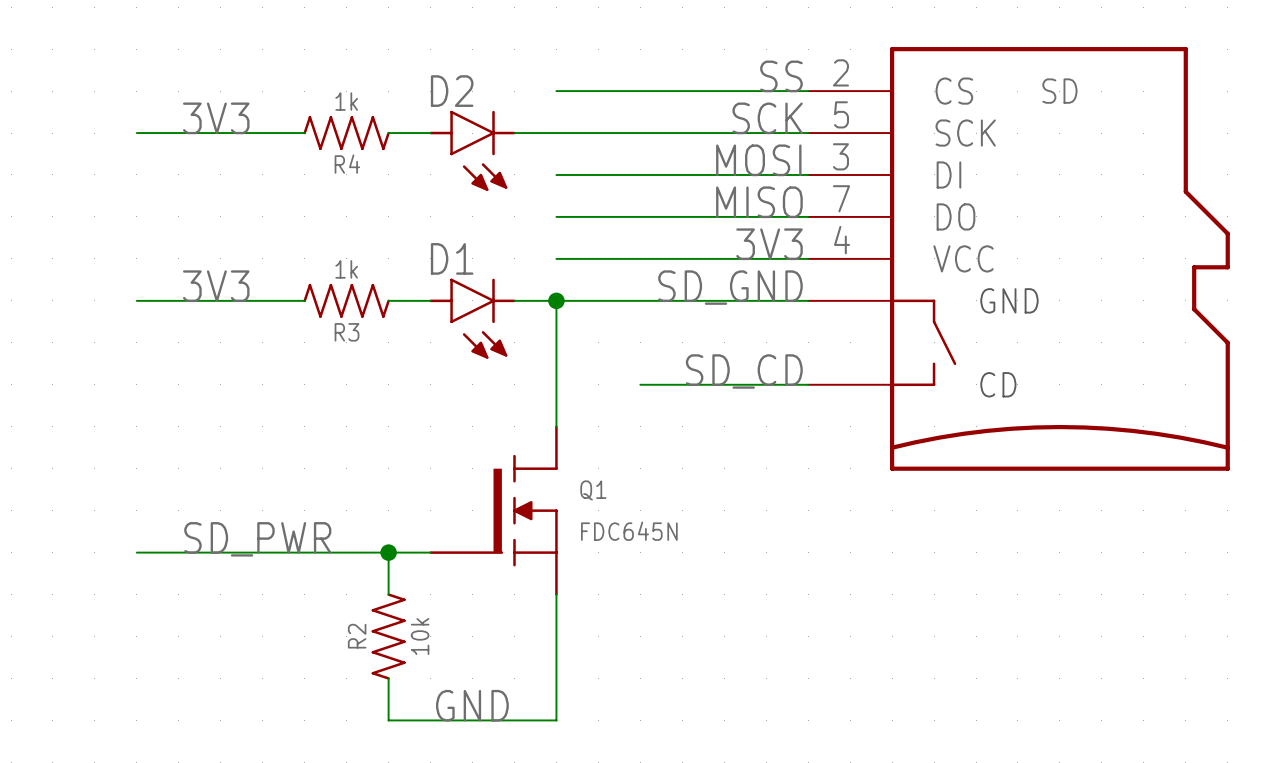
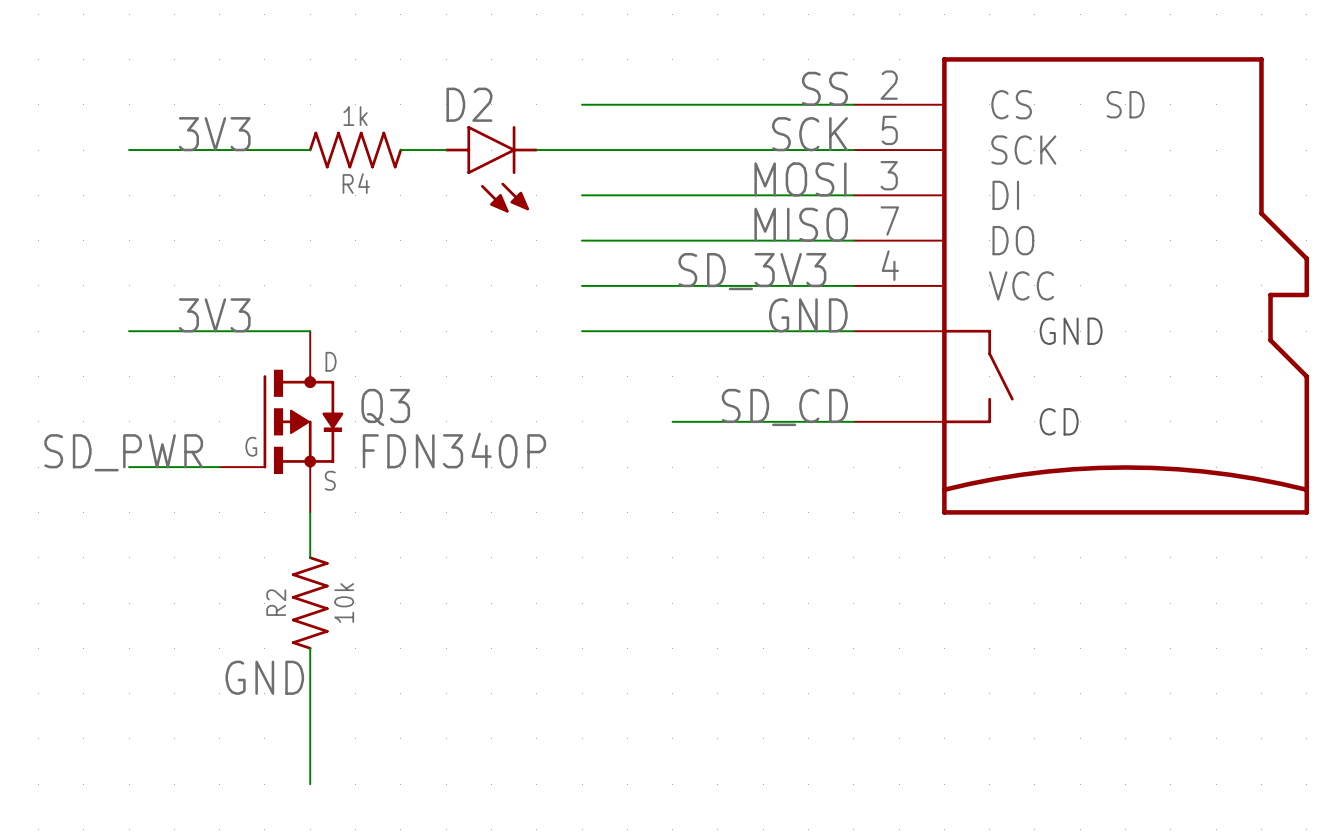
label: 3V3 (769, 244) -> SD_3V3 (752, 271)
label: SD_GND (730, 287) -> GND (808, 315)
R3: 1k (346, 300) -> none
wire: (388, 300) (430, 300) -> none
wire: (514, 300) (556, 300) (556, 426) -> none
junction: (556, 300) -> none
D1: (472, 318) -> none
Q3: none -> FDN340P (281, 421)
wire: none -> (129, 467) (219, 467)
Q1: FDC645N (493, 510) -> none
label position: SD_PWR (257, 539) -> SD_PWR (123, 452)
wire: (136, 552) (430, 552) -> none
wire: (388, 552) (388, 594) -> (310, 512) (310, 557)
junction: (388, 552) -> none
wire: none -> (310, 648) (310, 784)
wire: (556, 594) (556, 720) (388, 720) (388, 678) -> none
R2 position: (388, 636) -> (310, 603)
label position: GND (472, 705) -> GND (264, 677)

